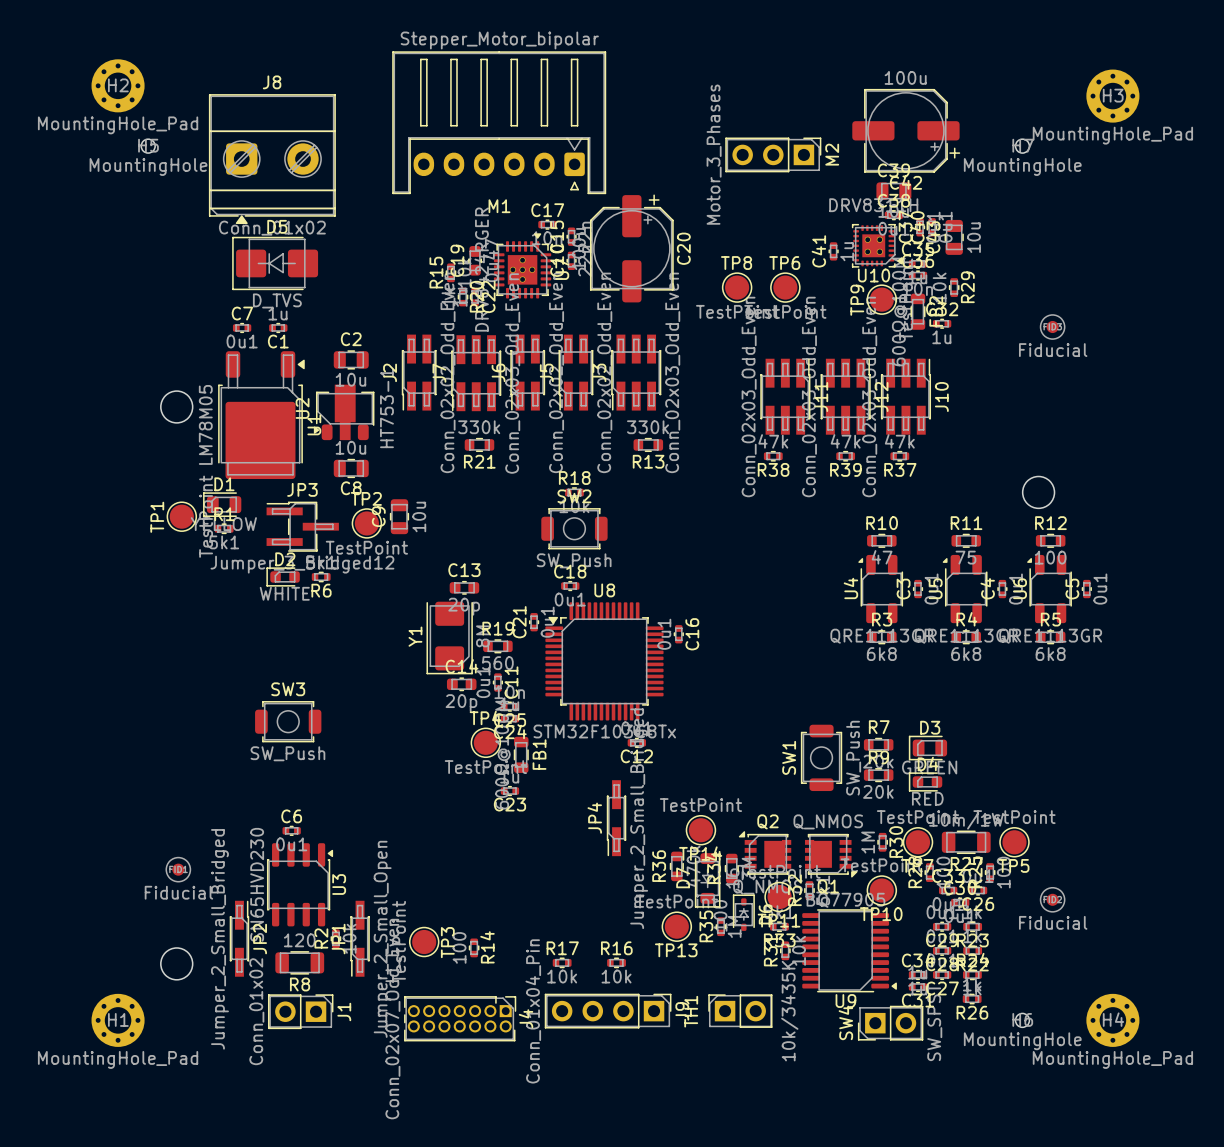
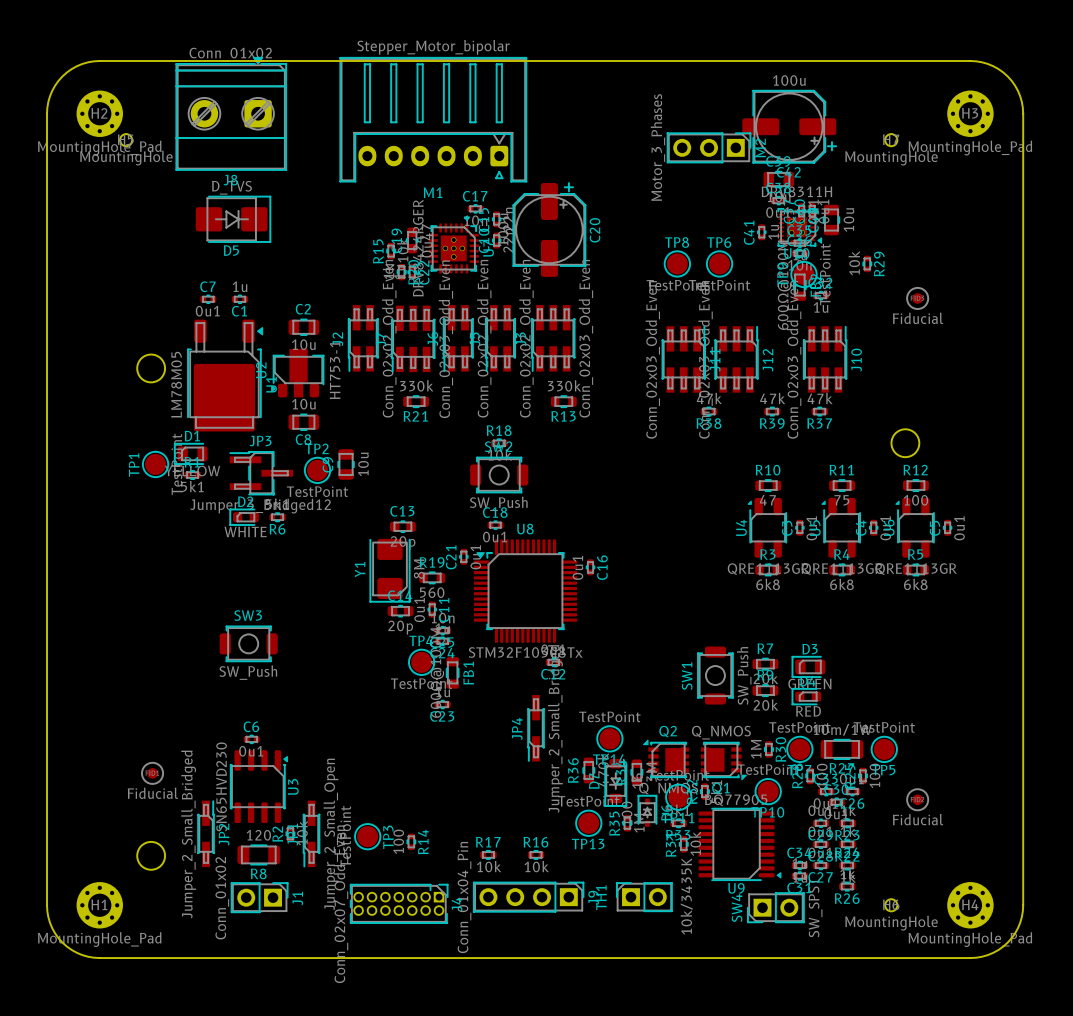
board edge: none -> (99, 61) (970, 61) (993, 66) (1007, 76) (1020, 96) (1023, 113) (1023, 905) (1020, 922) (1007, 942) (987, 955) (970, 958) (99, 958) (76, 952) (62, 942) (49, 922) (47, 905) (47, 113) (49, 96) (62, 76) (76, 66) (99, 61)
H2 position: (118, 85) -> (99, 113)
H3 position: (1112, 96) -> (970, 113)
M2 position: (773, 154) -> (709, 147)
J8 rotation: 0° (272, 159) -> 180° (231, 113)
U10 position: (877, 245) -> (799, 227)
C41 position: (833, 251) -> (761, 232)
D5 rotation: 0° (275, 263) -> 180° (233, 219)
TP8 position: (737, 287) -> (677, 263)
TP6 position: (785, 287) -> (719, 263)
R29 position: (954, 287) -> (867, 263)
TP9 position: (881, 299) -> (804, 274)
J10 position: (905, 396) -> (825, 359)
R38 position: (773, 456) -> (709, 411)
R39 position: (845, 456) -> (772, 411)
R37 position: (899, 456) -> (819, 411)

